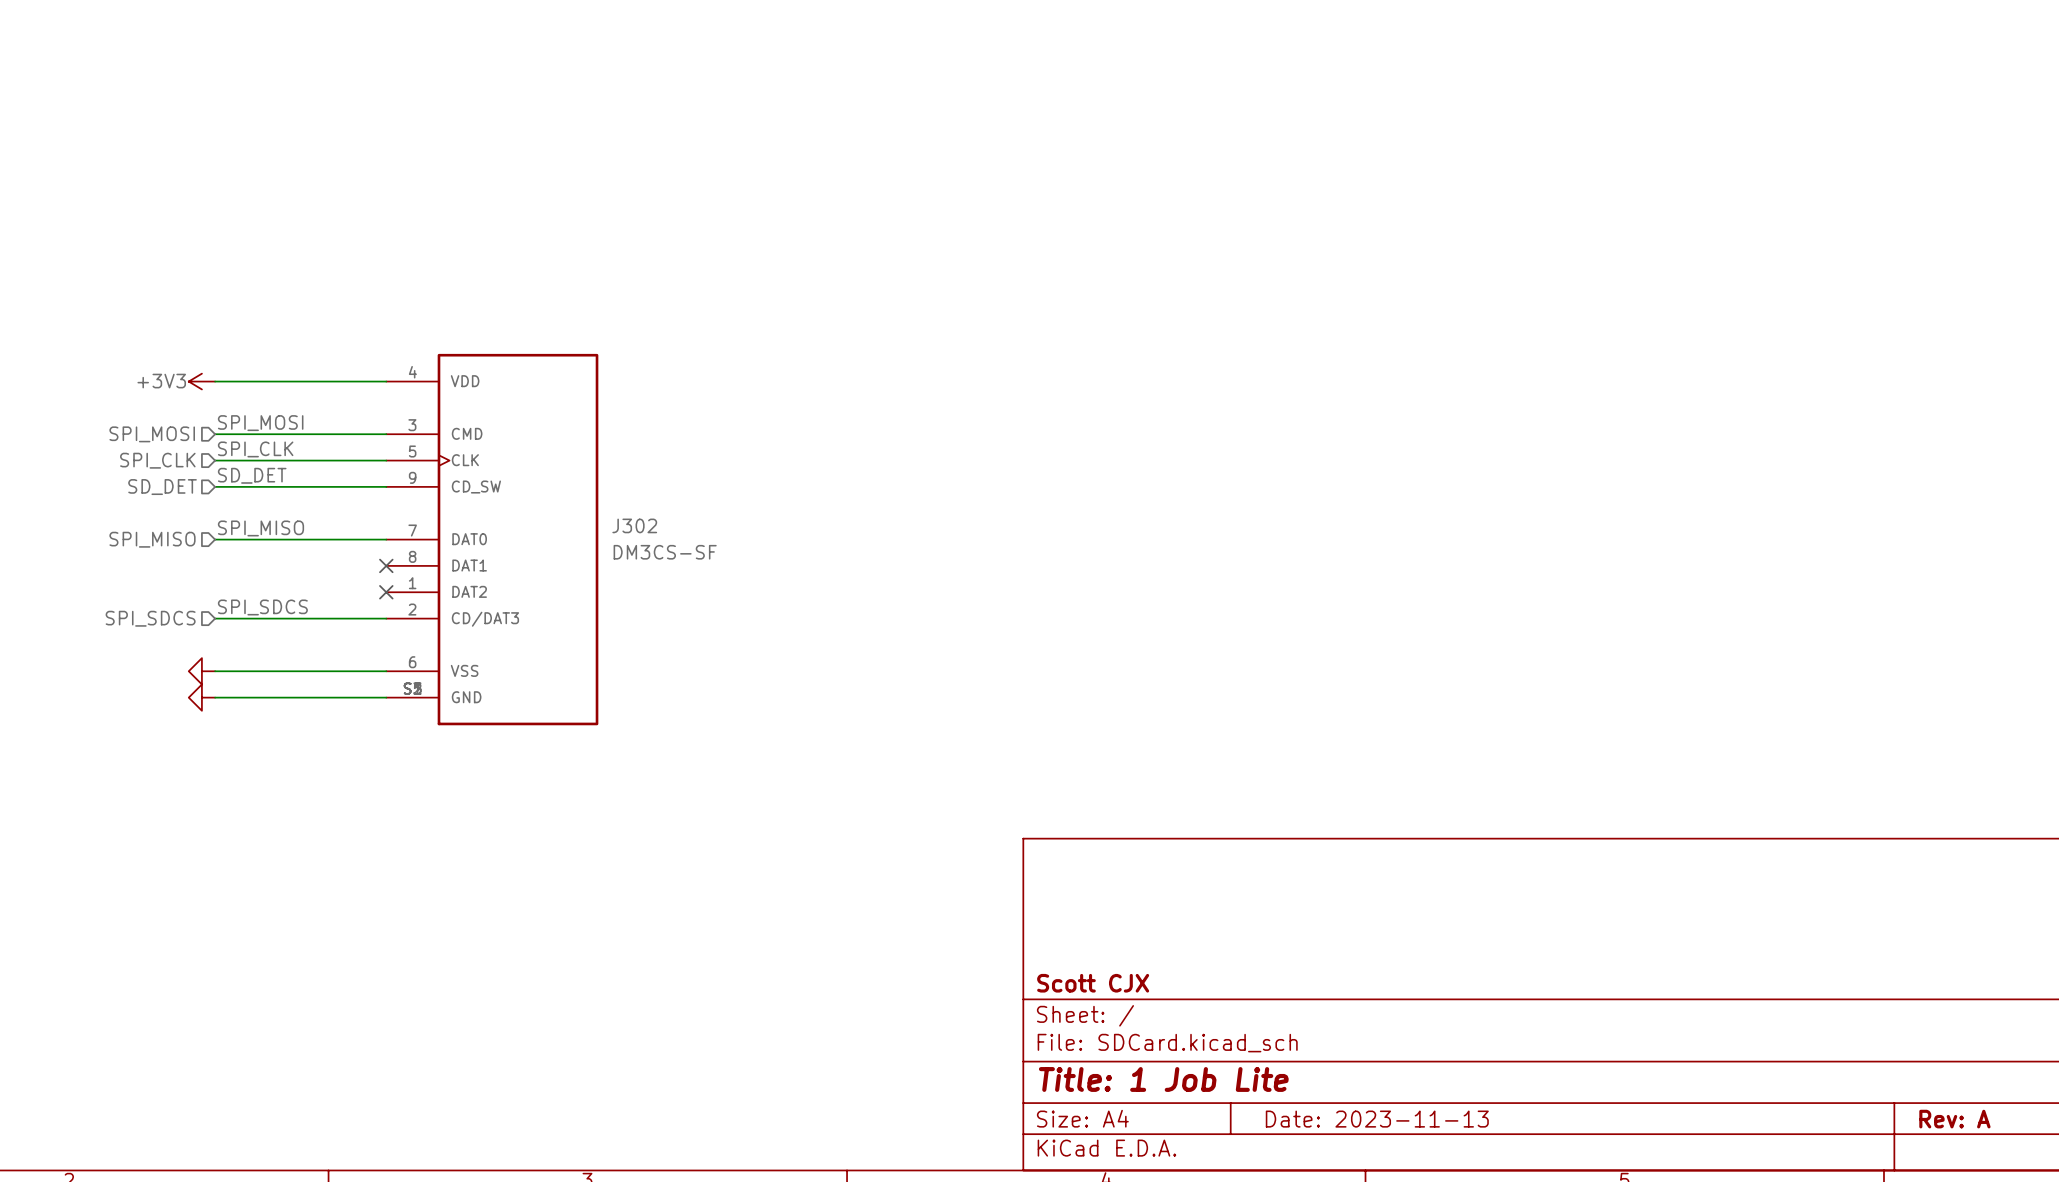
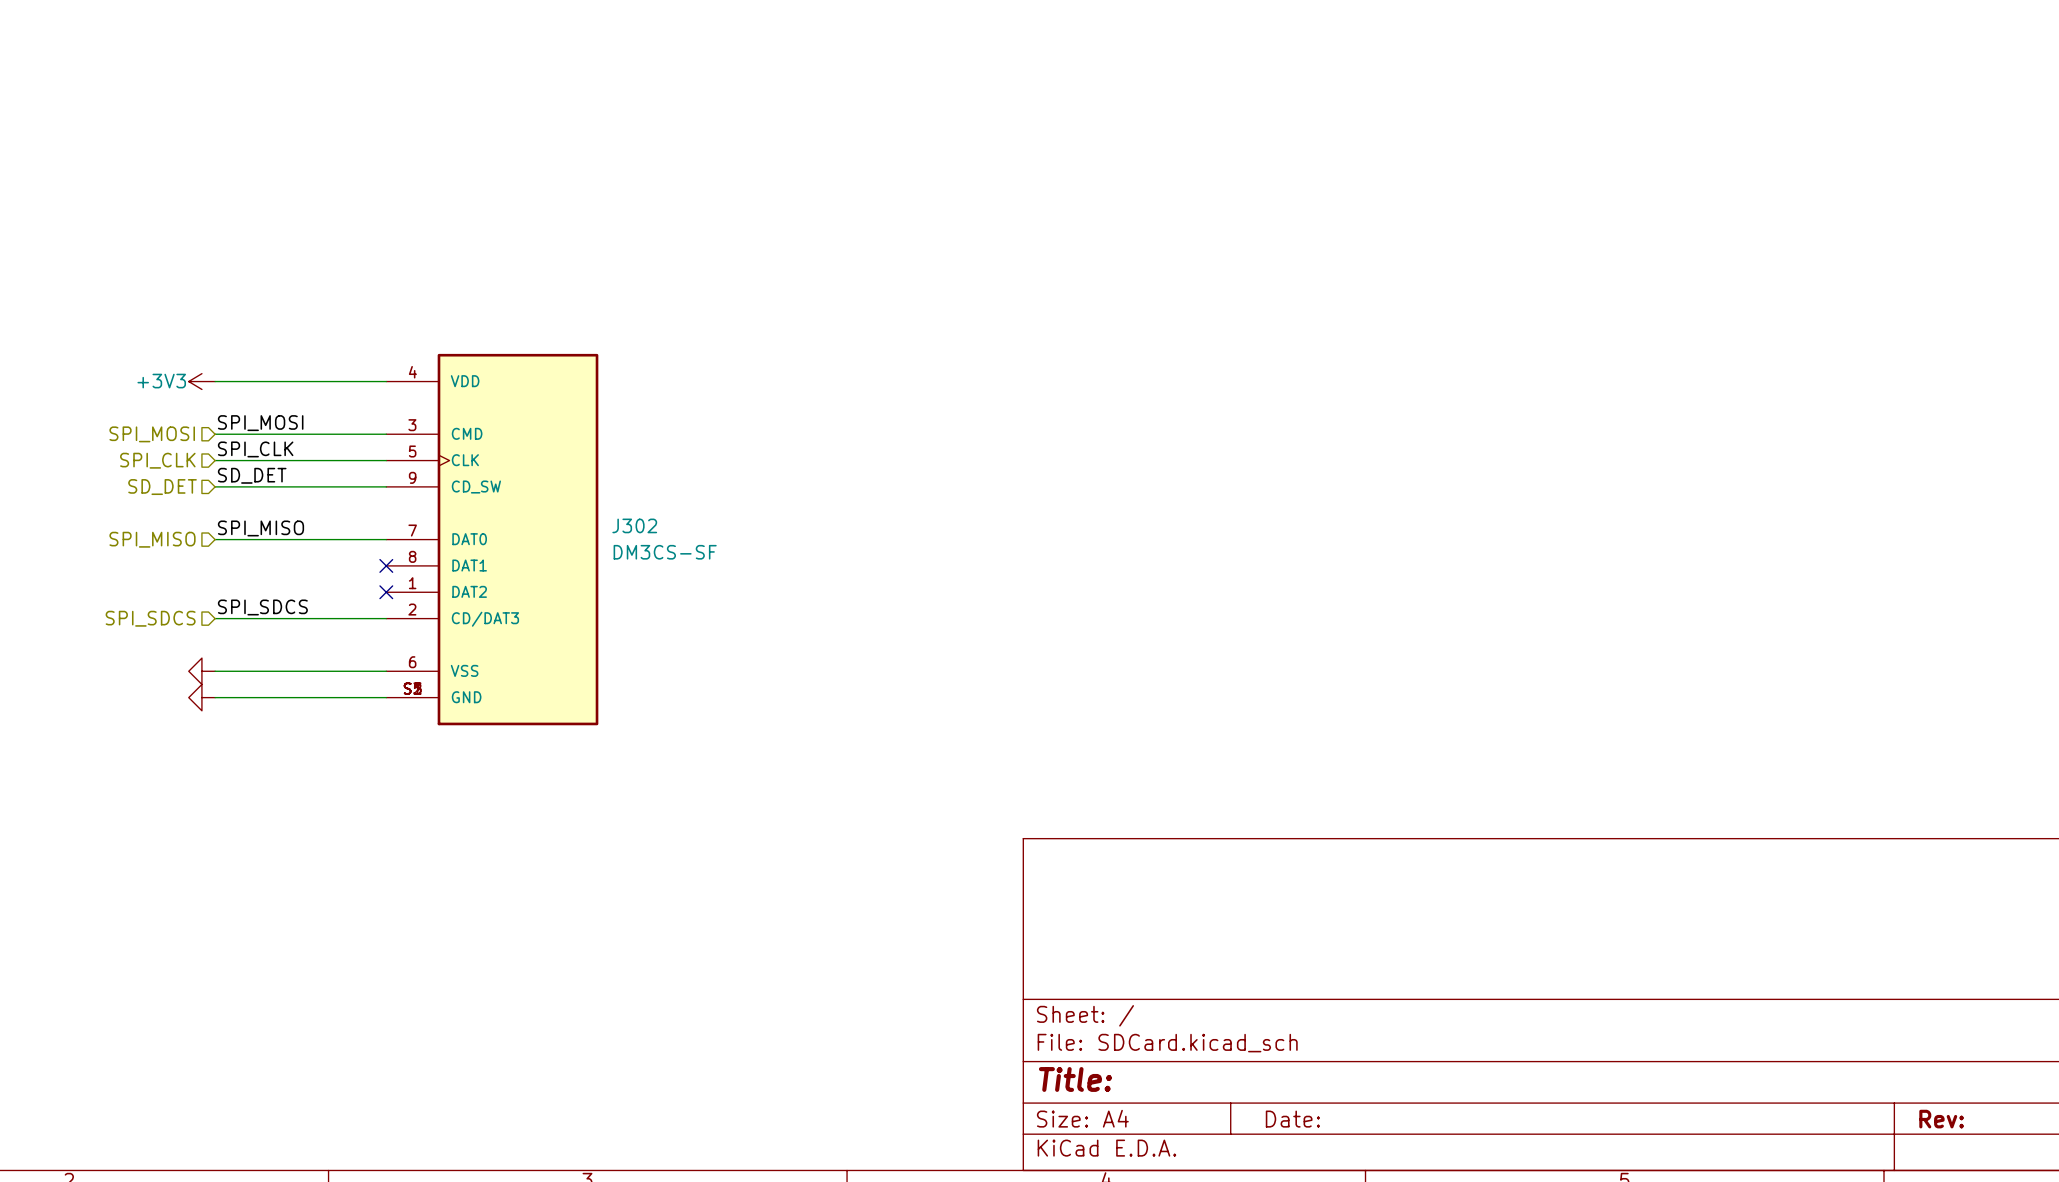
title block: Scott CJX (1093, 983) -> none
title block: Title: 1 Job Lite (1163, 1079) -> Title: (1075, 1079)
title block: Date: 2023-11-13 (1377, 1119) -> Date: (1292, 1119)
title block: Rev: A (1954, 1119) -> Rev: (1941, 1119)

